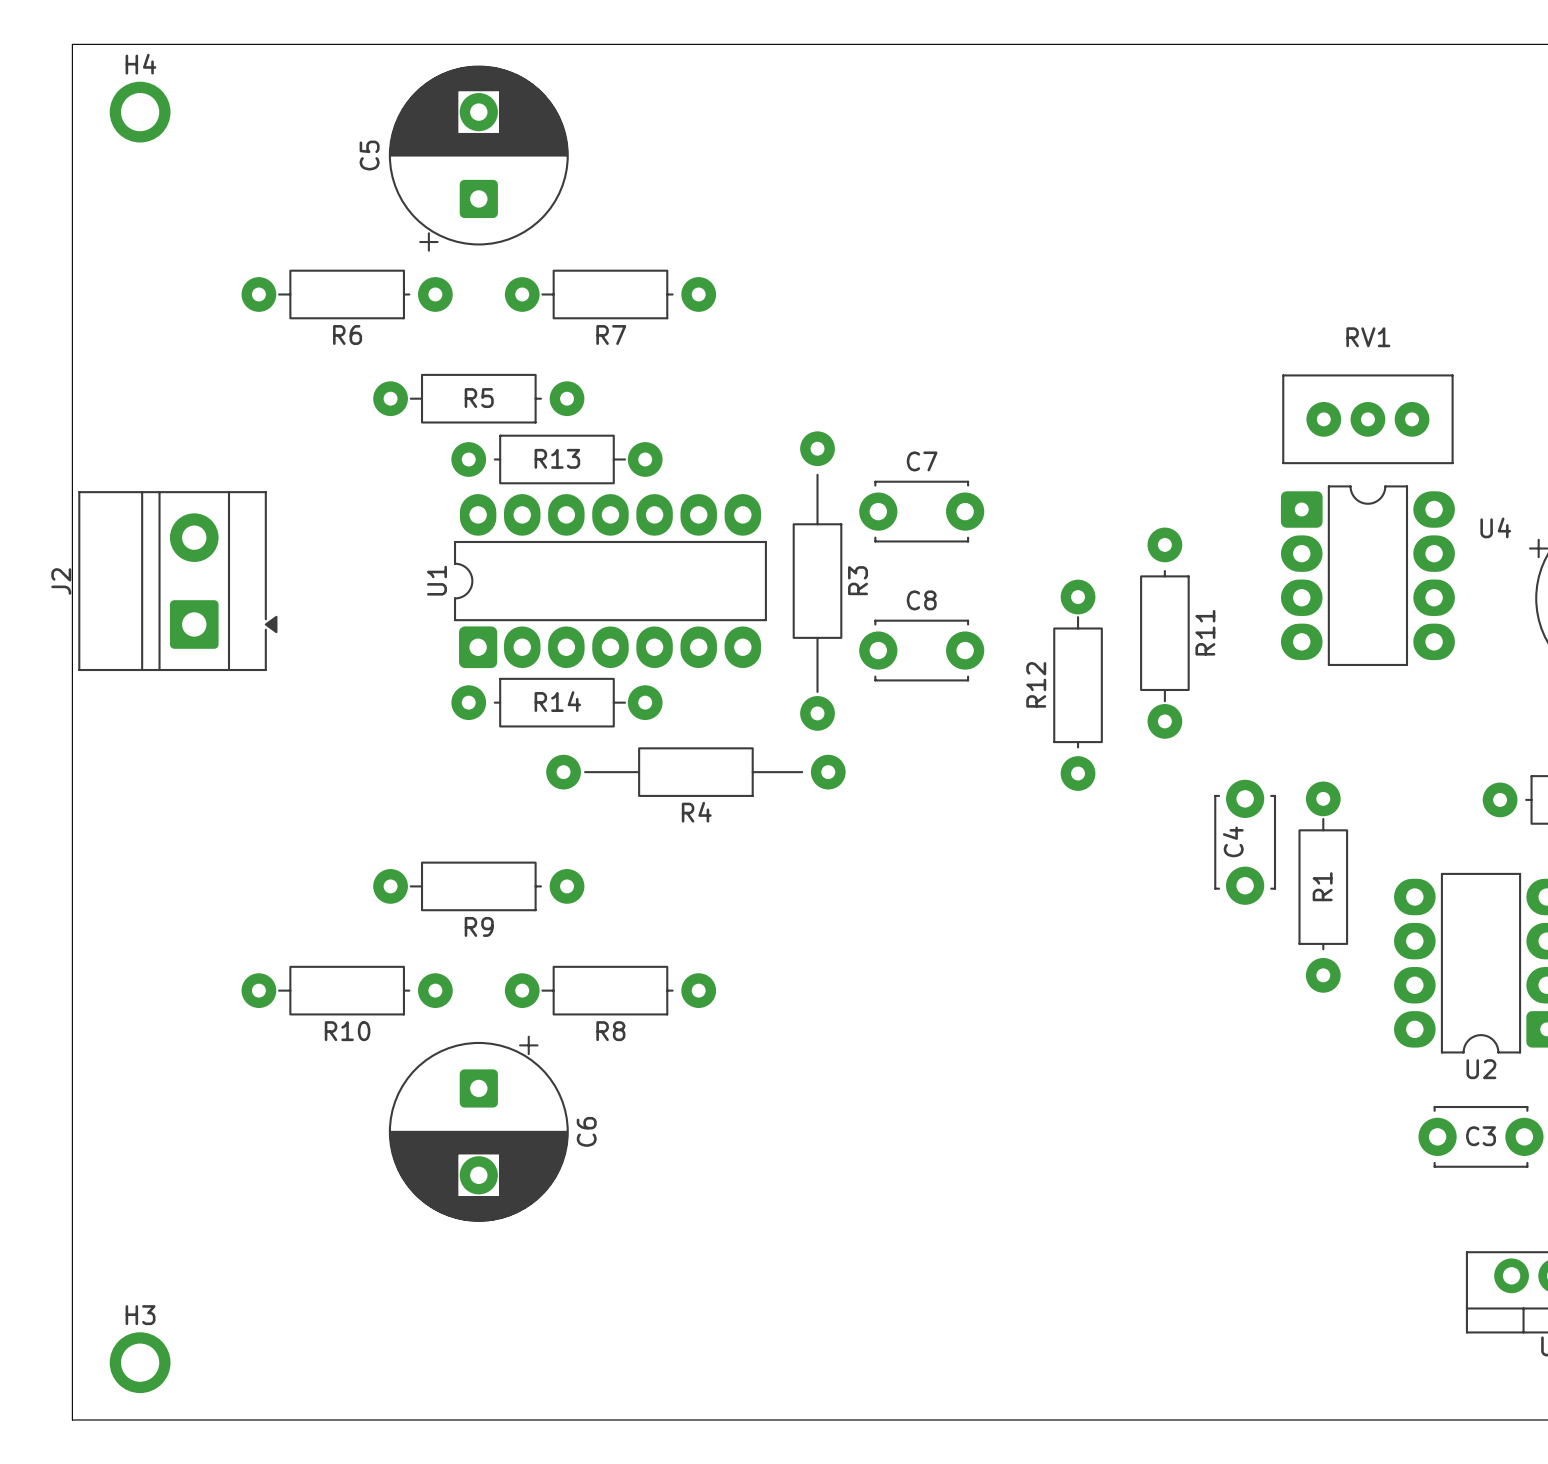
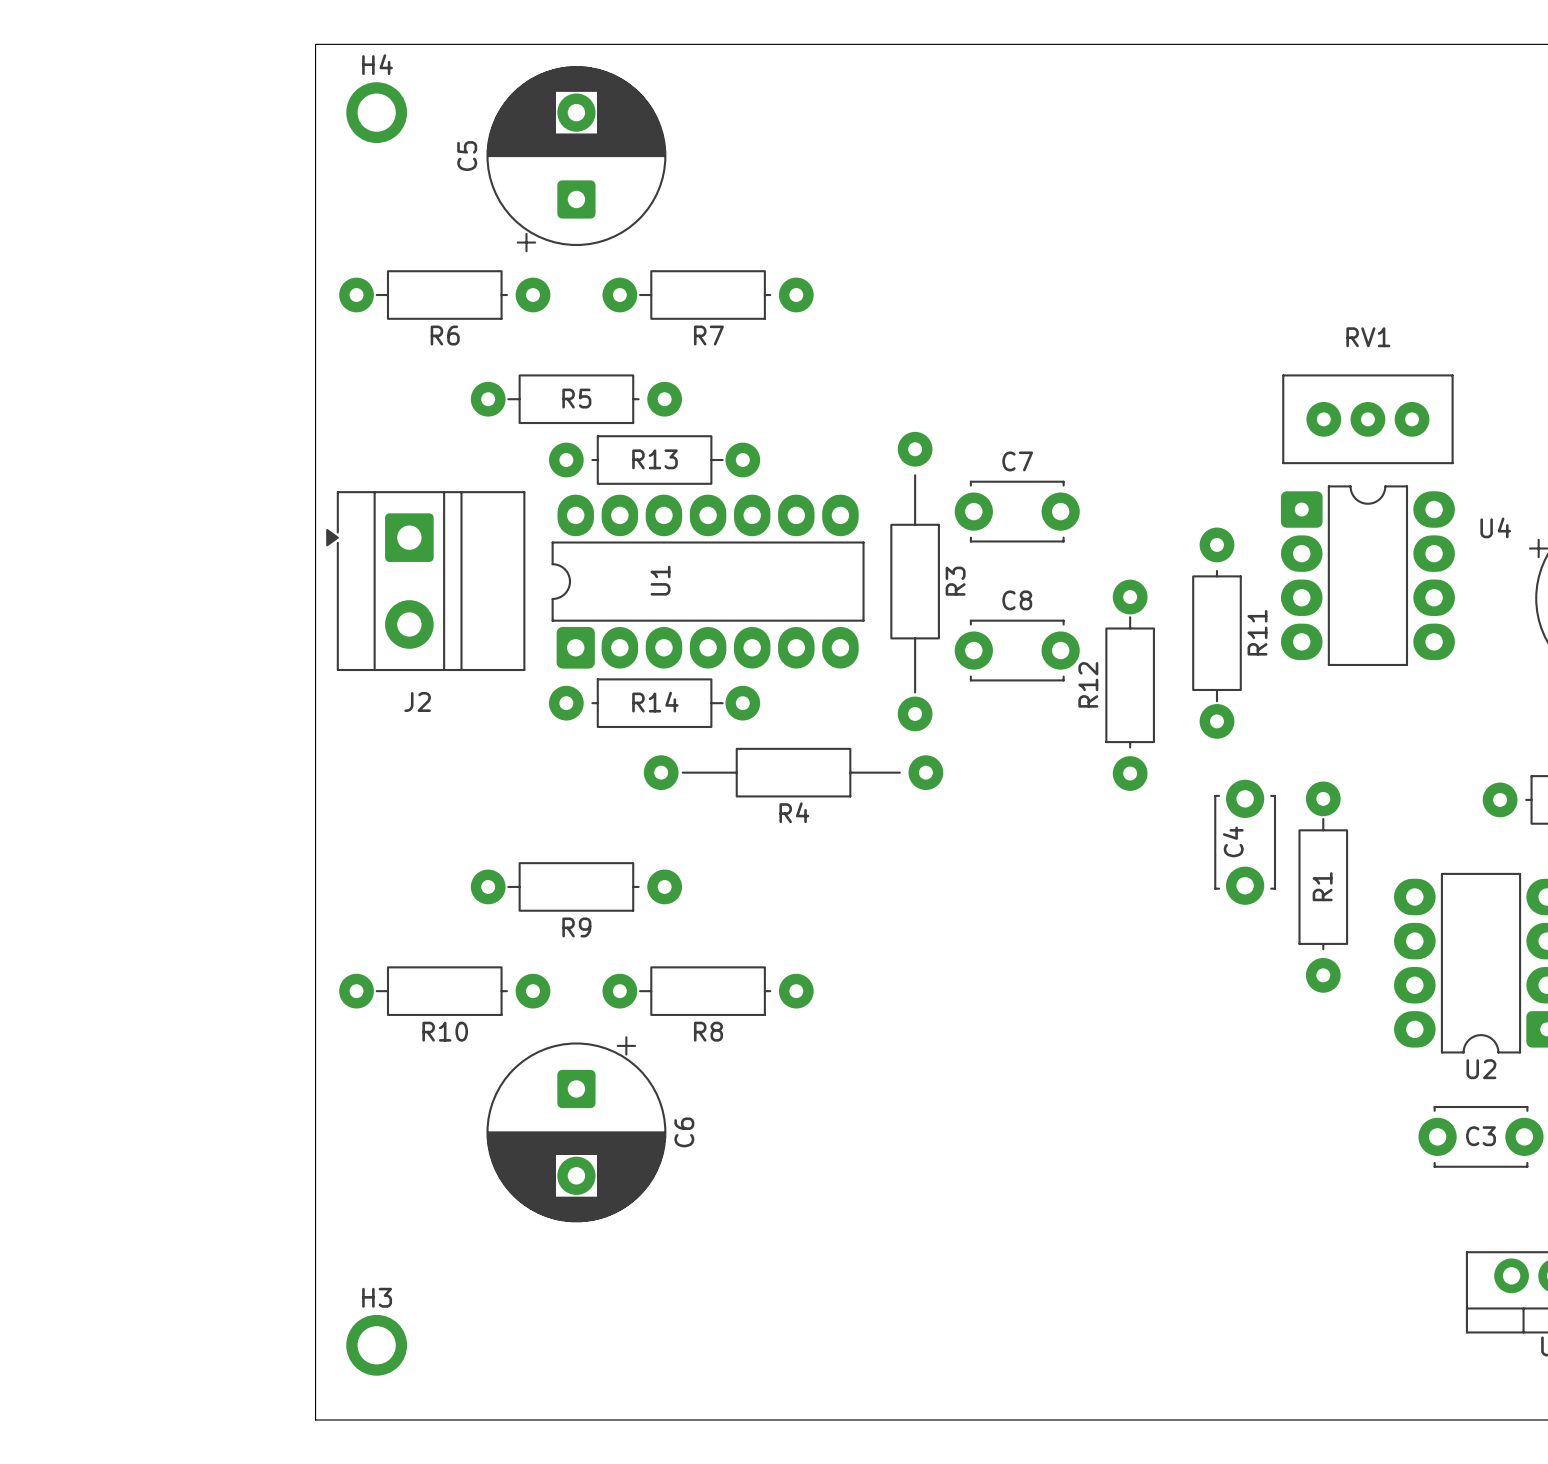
board edge: (315, 44) (72, 44) (72, 1419) (315, 1419) -> (315, 44) (315, 1419)
H4 position: (140, 112) -> (376, 112)
C5 position: (478, 158) -> (576, 159)
R6 position: (347, 294) -> (444, 295)
R7 position: (610, 294) -> (708, 295)
R5 position: (478, 398) -> (576, 399)
R13 position: (556, 459) -> (654, 460)
C7 position: (921, 511) -> (1017, 511)
U1 name position: U1 (437, 580) -> U1 (660, 580)
J2 name position: J2 (61, 581) -> J2 (417, 702)
J2 rotation: 0° (177, 581) -> 180° (425, 581)
J2 position: (177, 581) -> (425, 581)
U1 position: (610, 581) -> (708, 581)
R3 position: (817, 581) -> (915, 581)
R11 position: (1164, 633) -> (1216, 633)
C8 position: (921, 650) -> (1017, 650)
R12 position: (1078, 685) -> (1130, 685)
R14 position: (556, 702) -> (654, 703)
R4 position: (695, 772) -> (793, 772)
R9 position: (478, 886) -> (576, 886)
R10 position: (347, 990) -> (444, 991)
R8 position: (610, 990) -> (708, 991)
C6 position: (478, 1128) -> (576, 1129)
H3 position: (140, 1362) -> (376, 1345)

